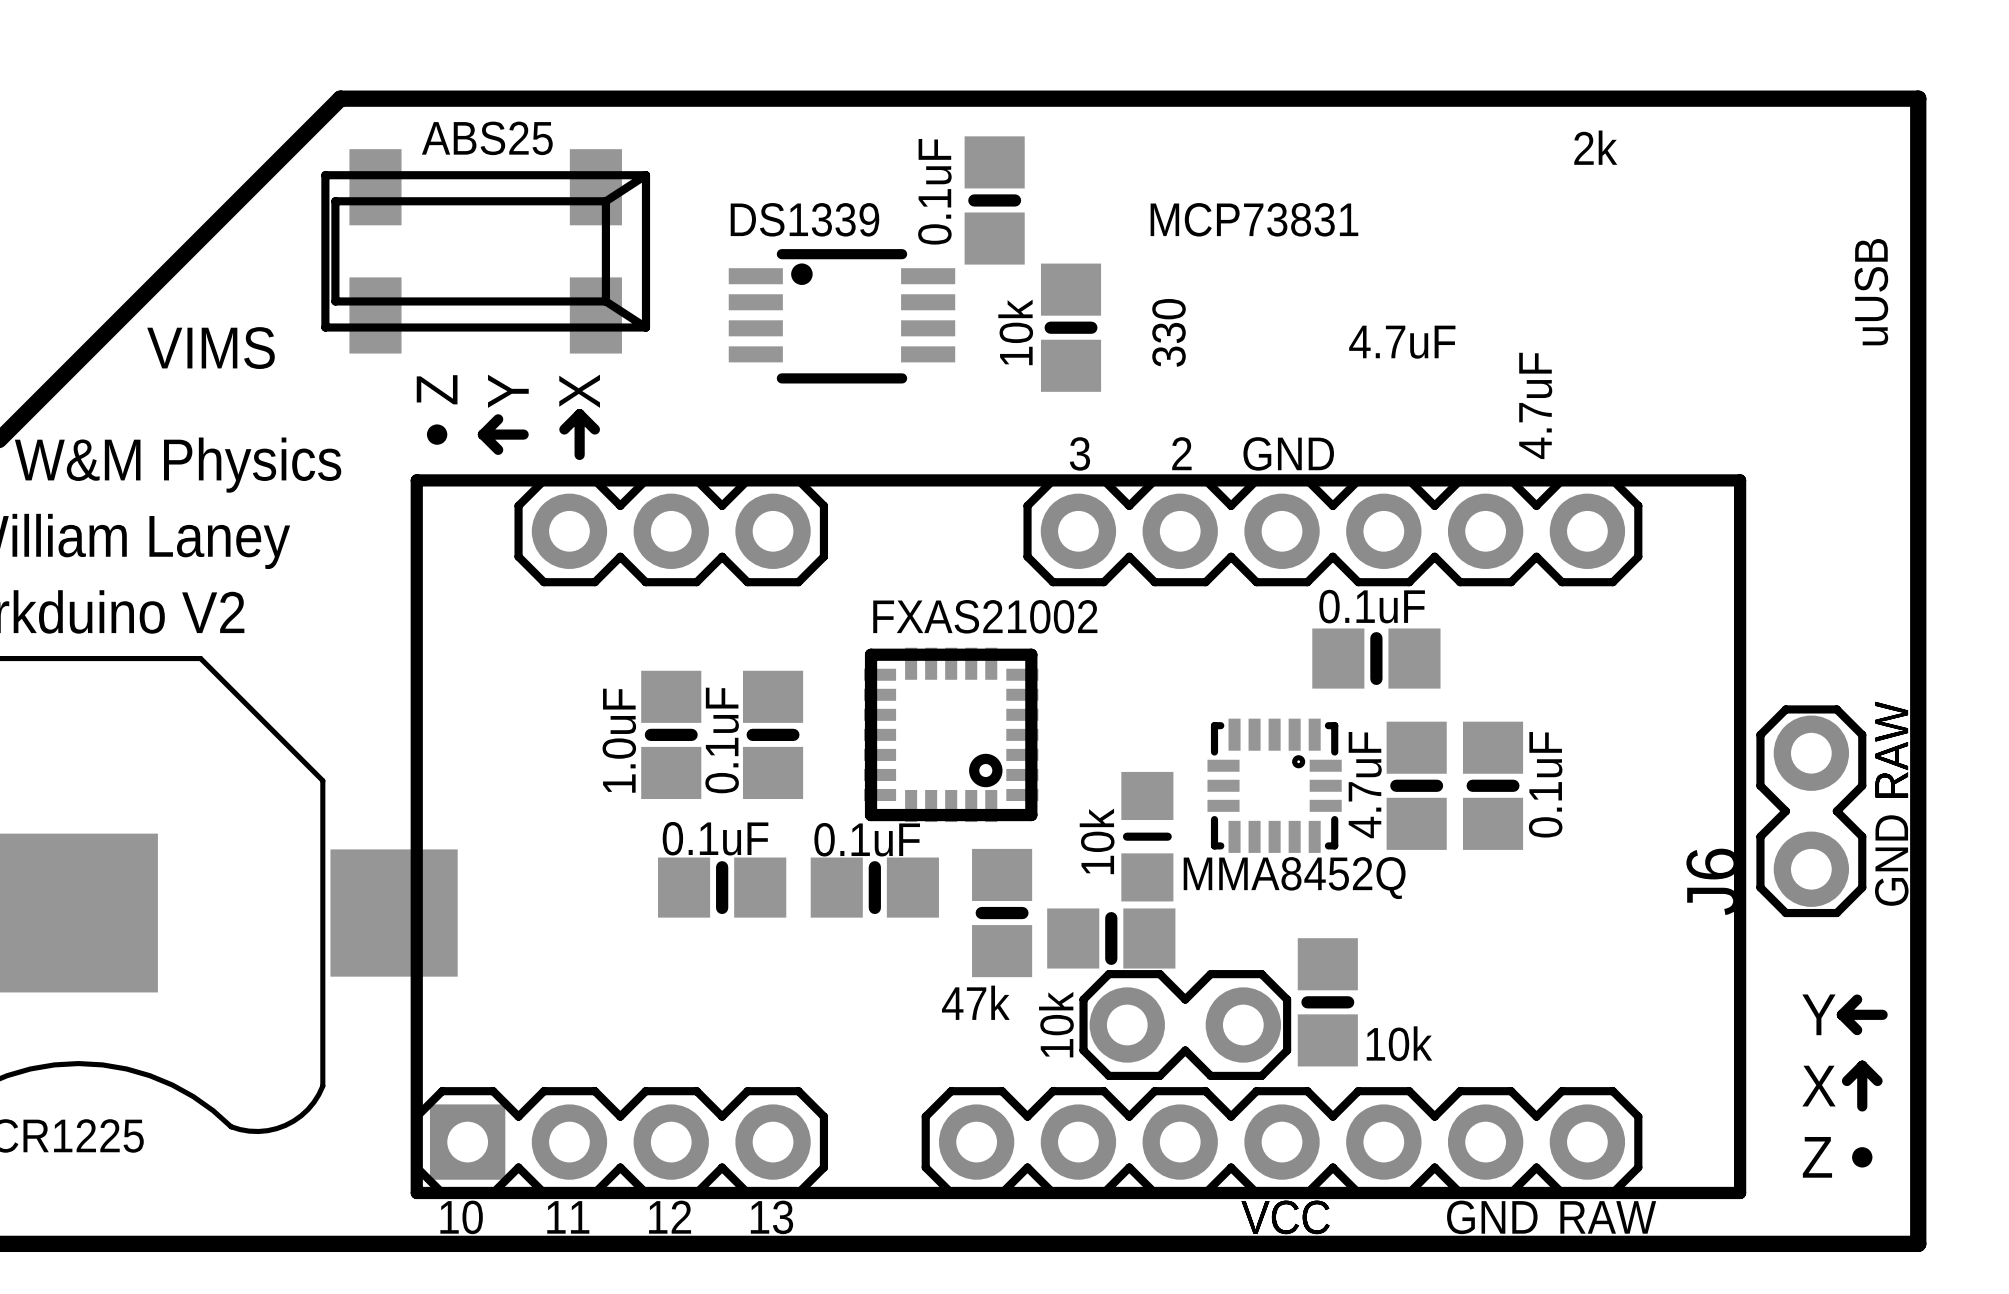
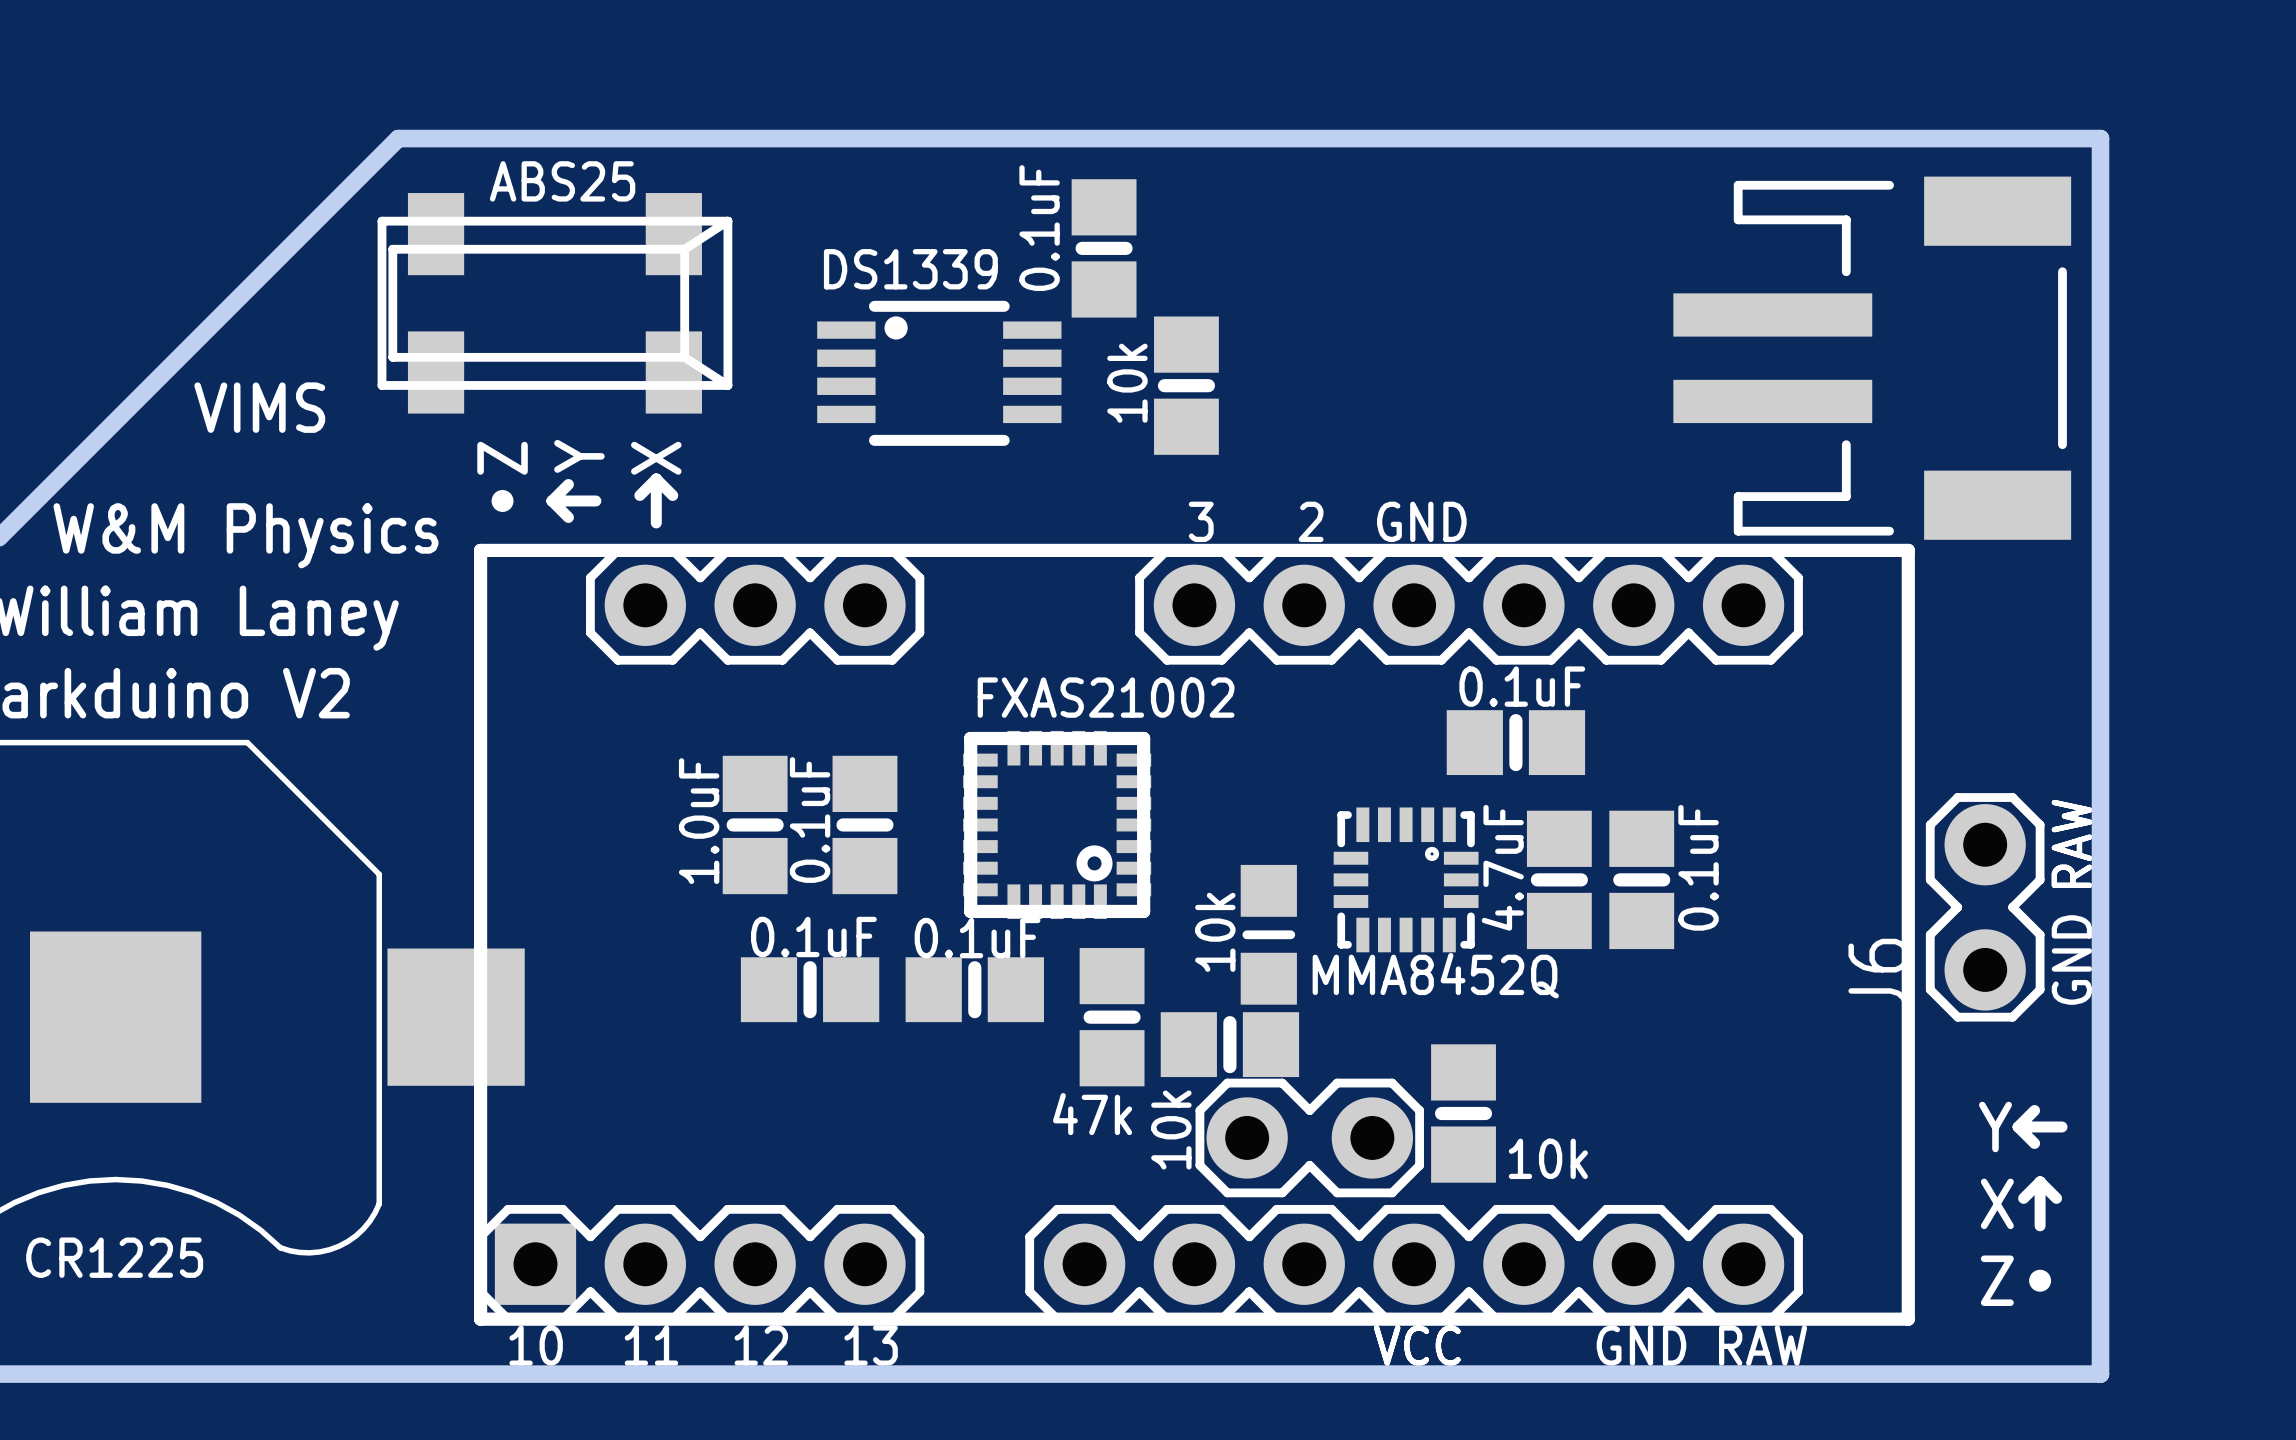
text: 2k (1595, 147) -> none
text: MCP73831 (1254, 219) -> none
text: uUSB (1871, 292) -> none
part: none -> (1872, 358)
text: 330 (1169, 332) -> none
text: 4.7uF (1402, 342) -> none
text: 4.7uF (1535, 405) -> none

